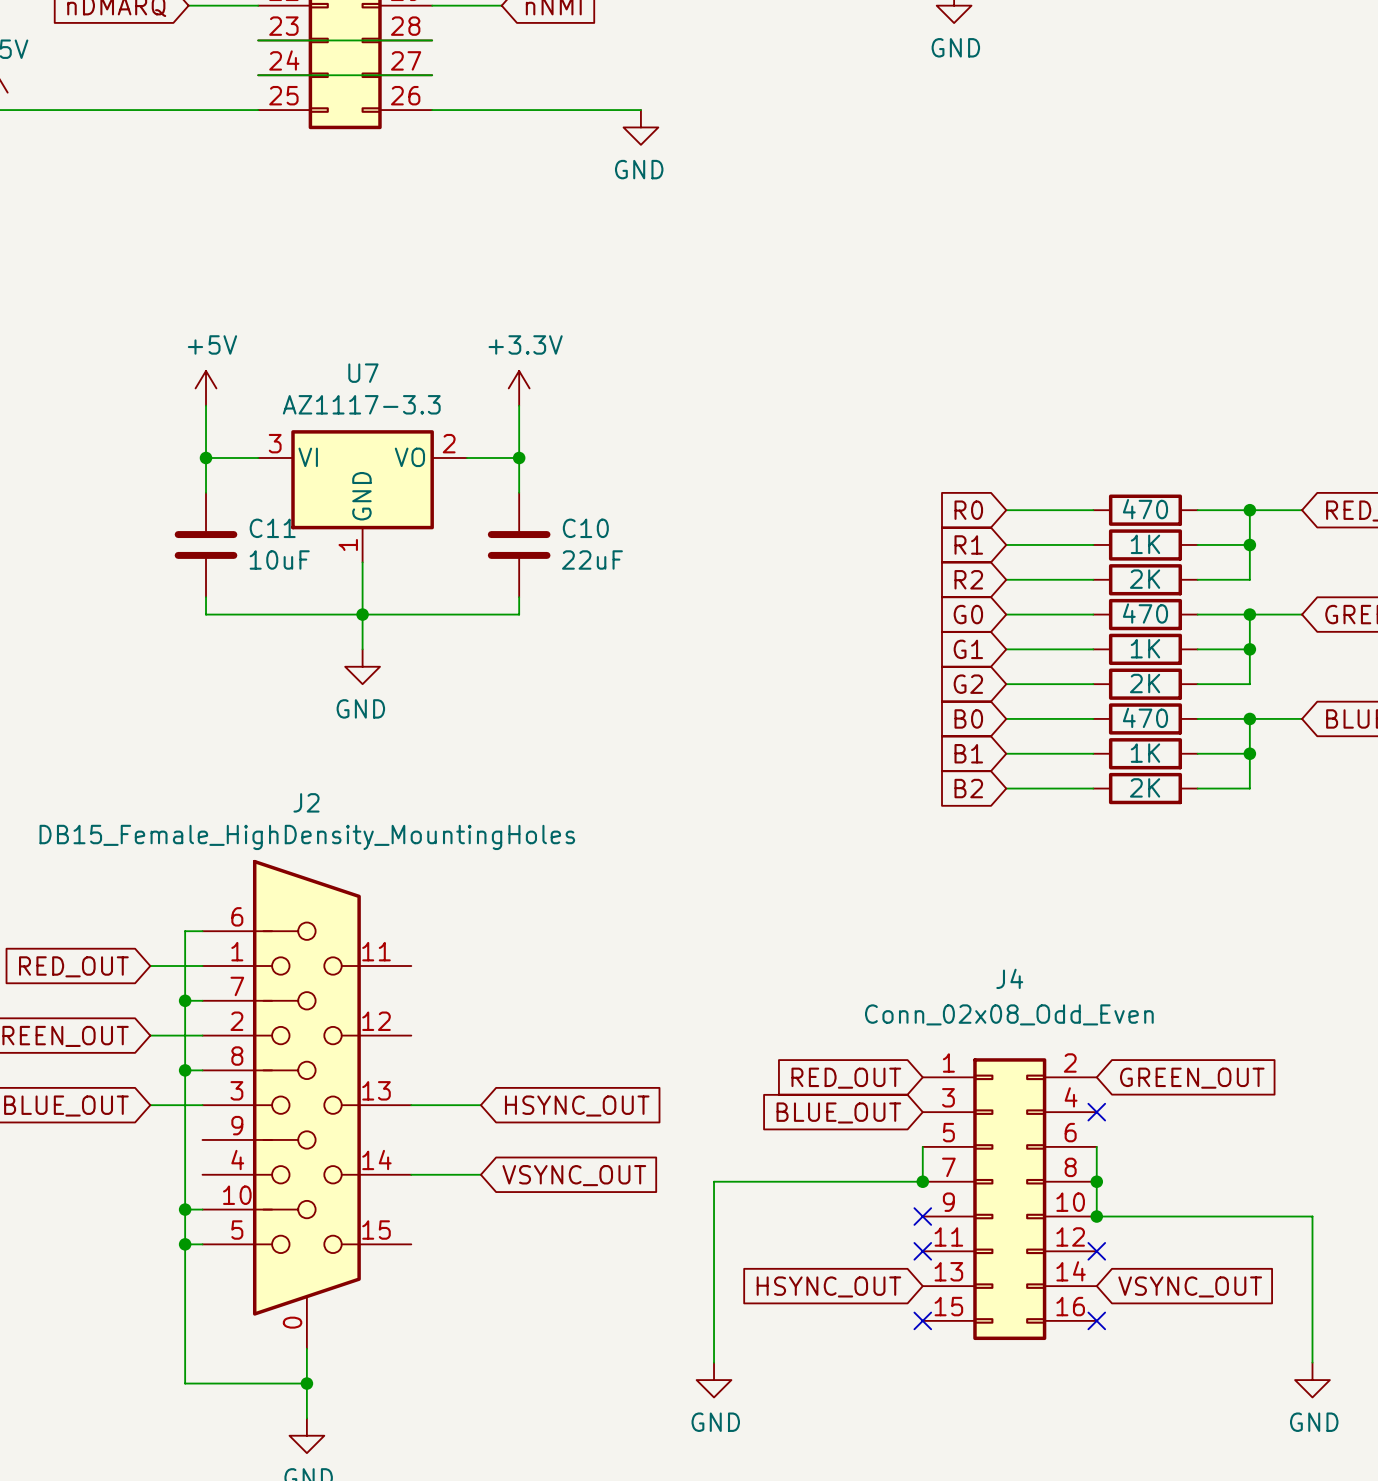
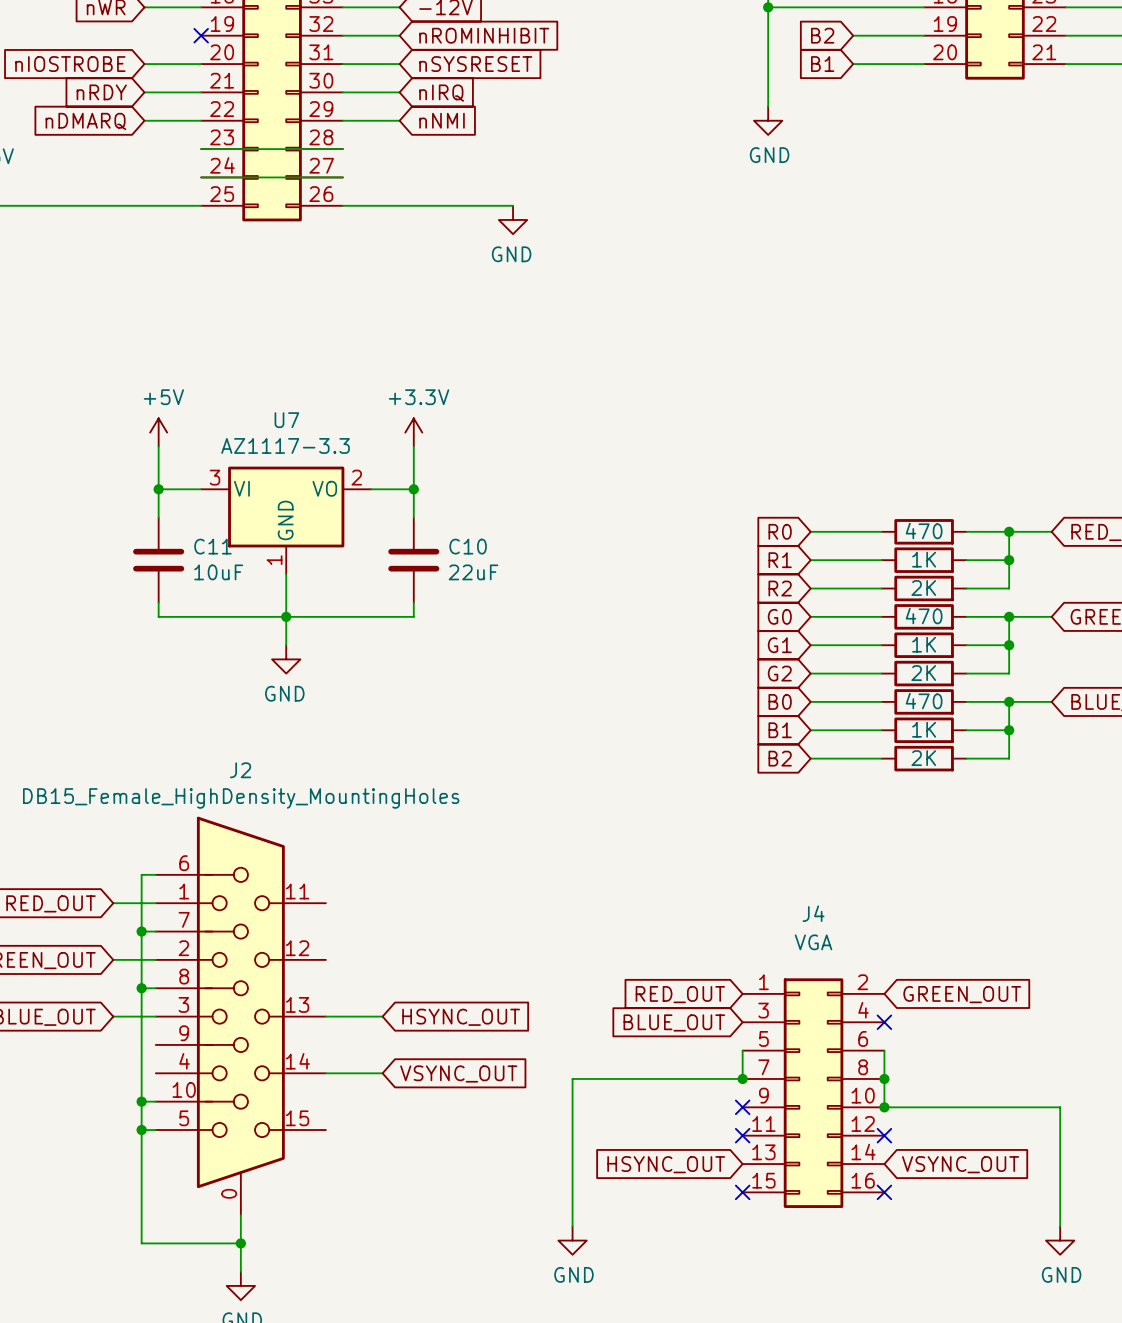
J4 value: Conn_02x08_Odd_Even (1009, 1014) -> VGA (813, 942)

